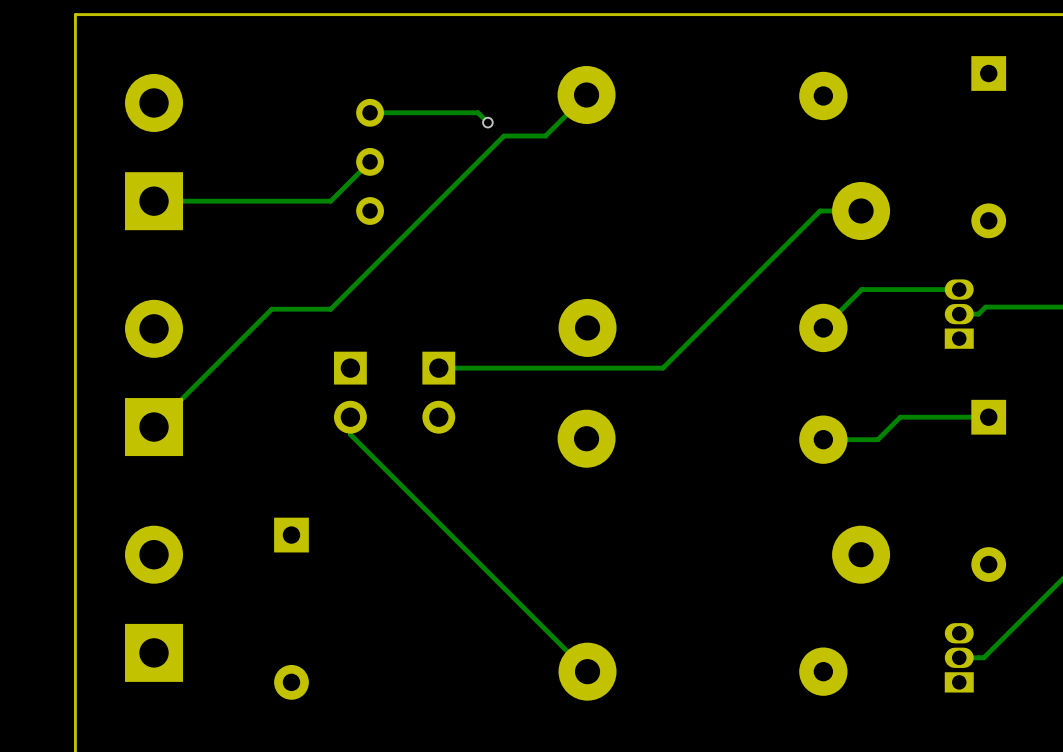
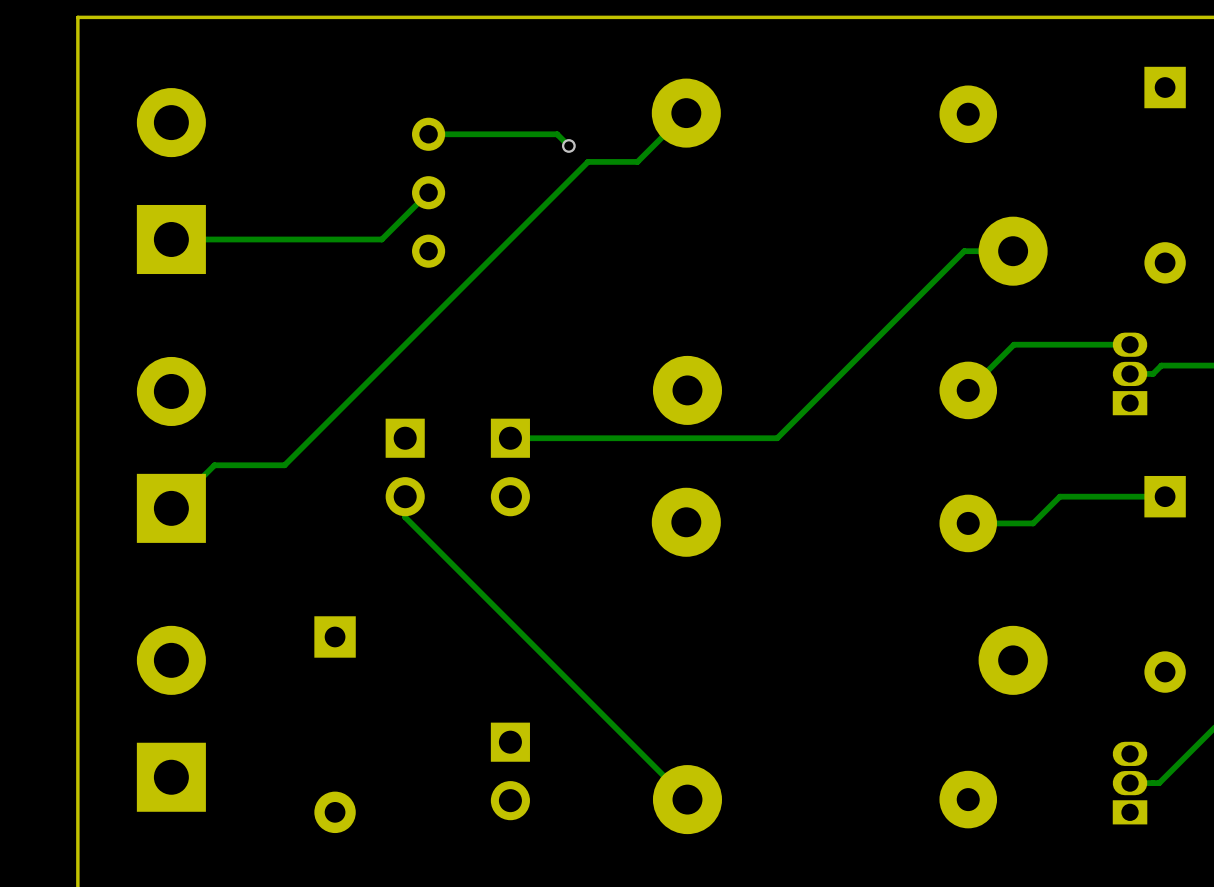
track: (330, 309) (271, 309) (190, 390) -> (381, 368) (284, 465) (214, 465)
part: none -> (510, 771)

